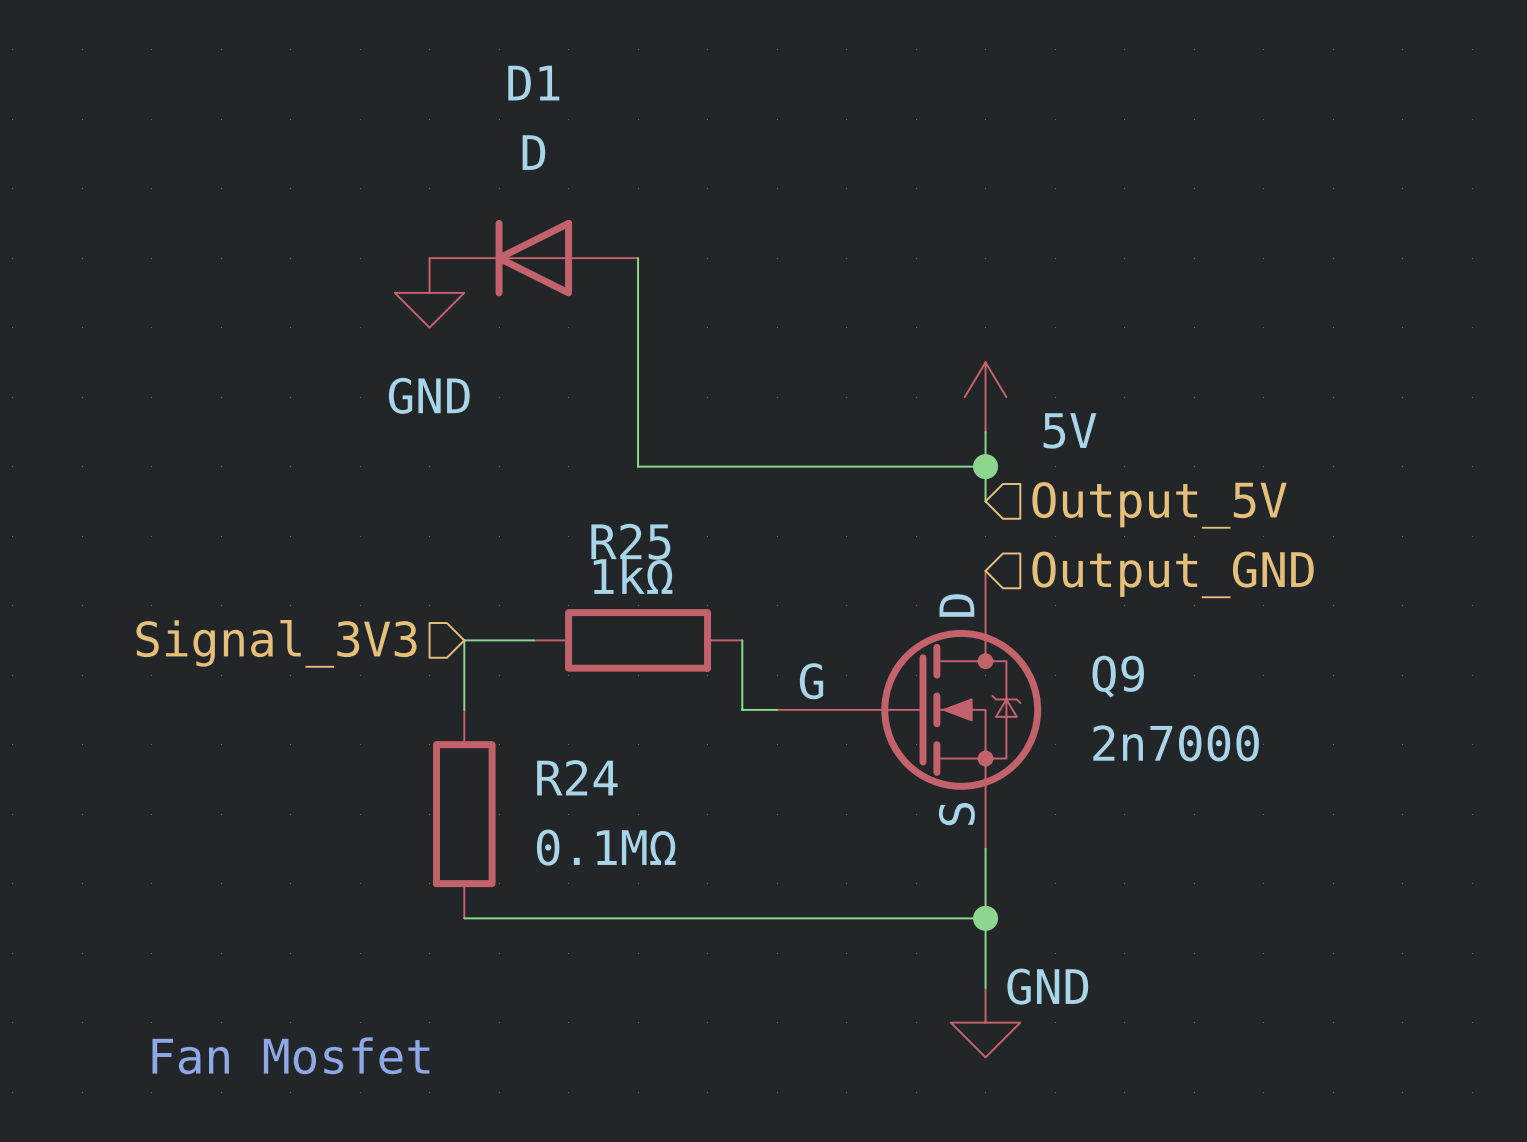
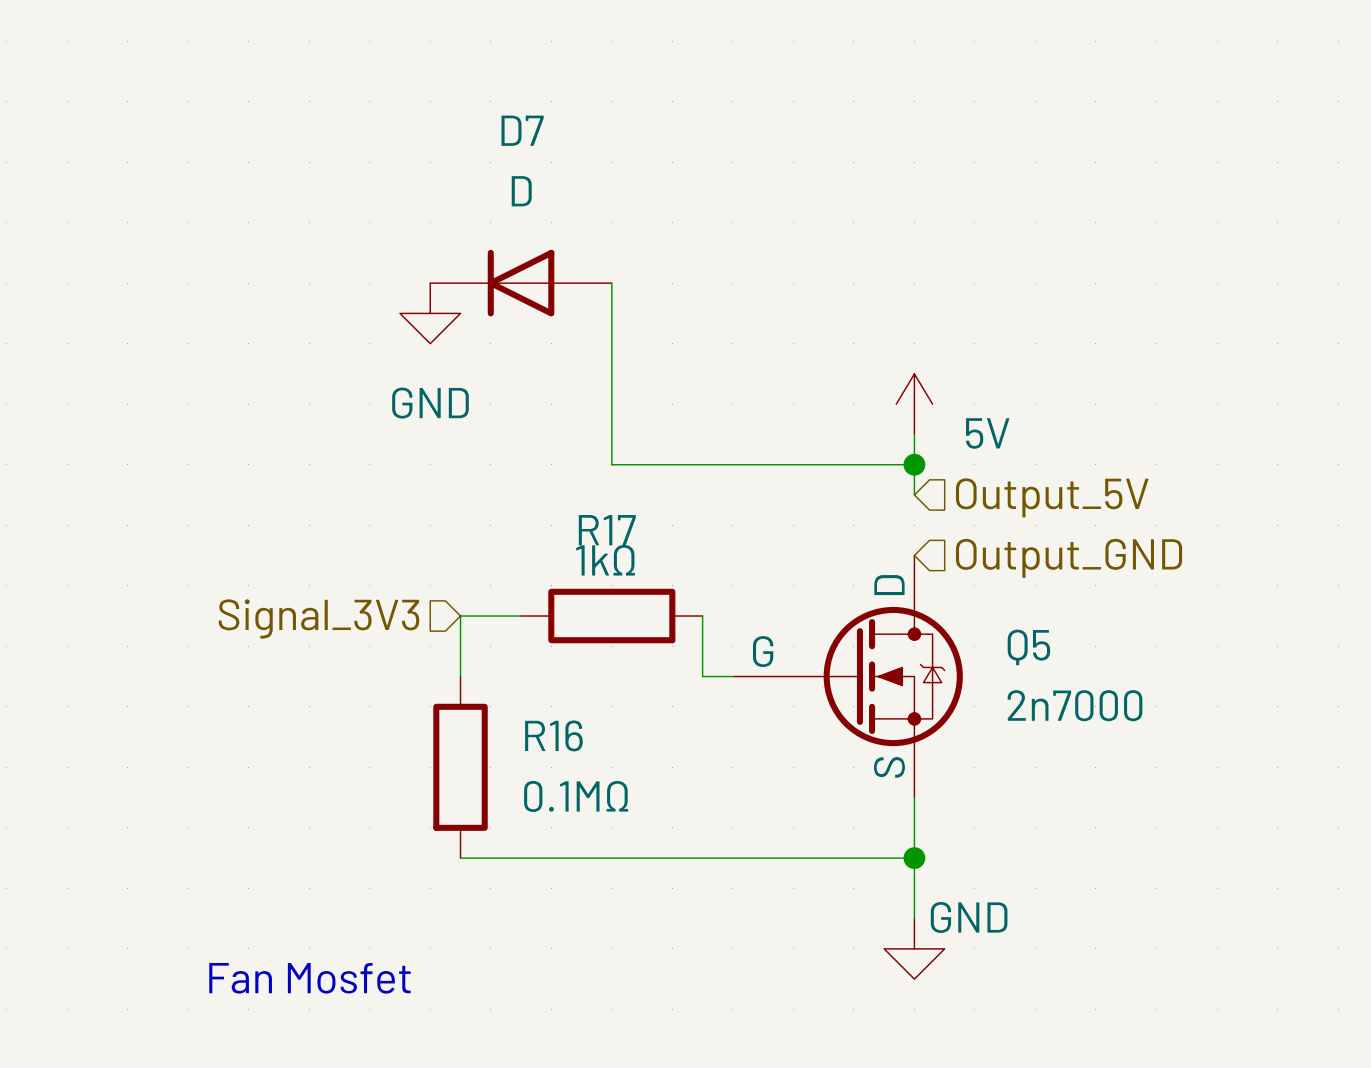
D1 name: D1 (533, 83) -> D7 (522, 130)
R25 name: R25 (630, 541) -> R17 (607, 530)
Q9 name: Q9 (1118, 676) -> Q5 (1028, 647)
R24 name: R24 (577, 777) -> R16 (553, 735)

